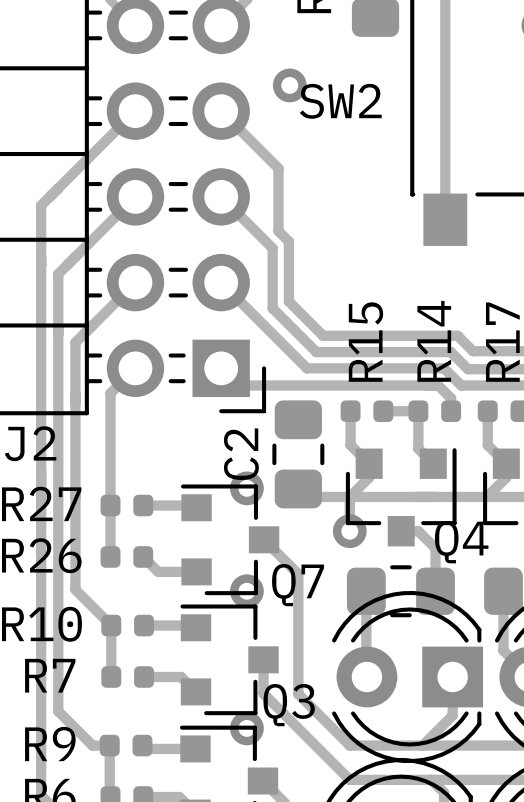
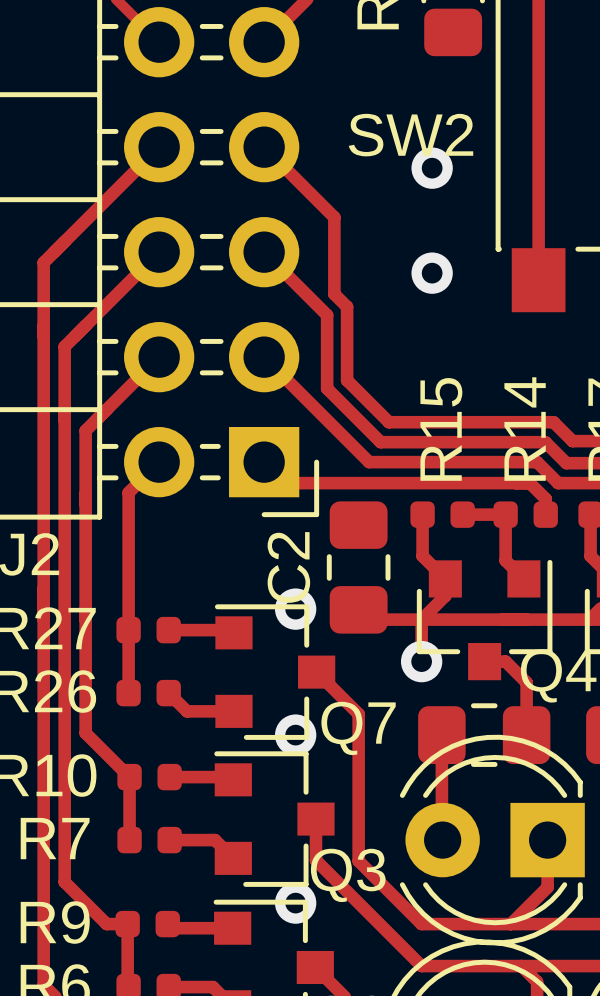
via: (289, 85) -> none
via: none -> (432, 168)
via: none -> (432, 273)

